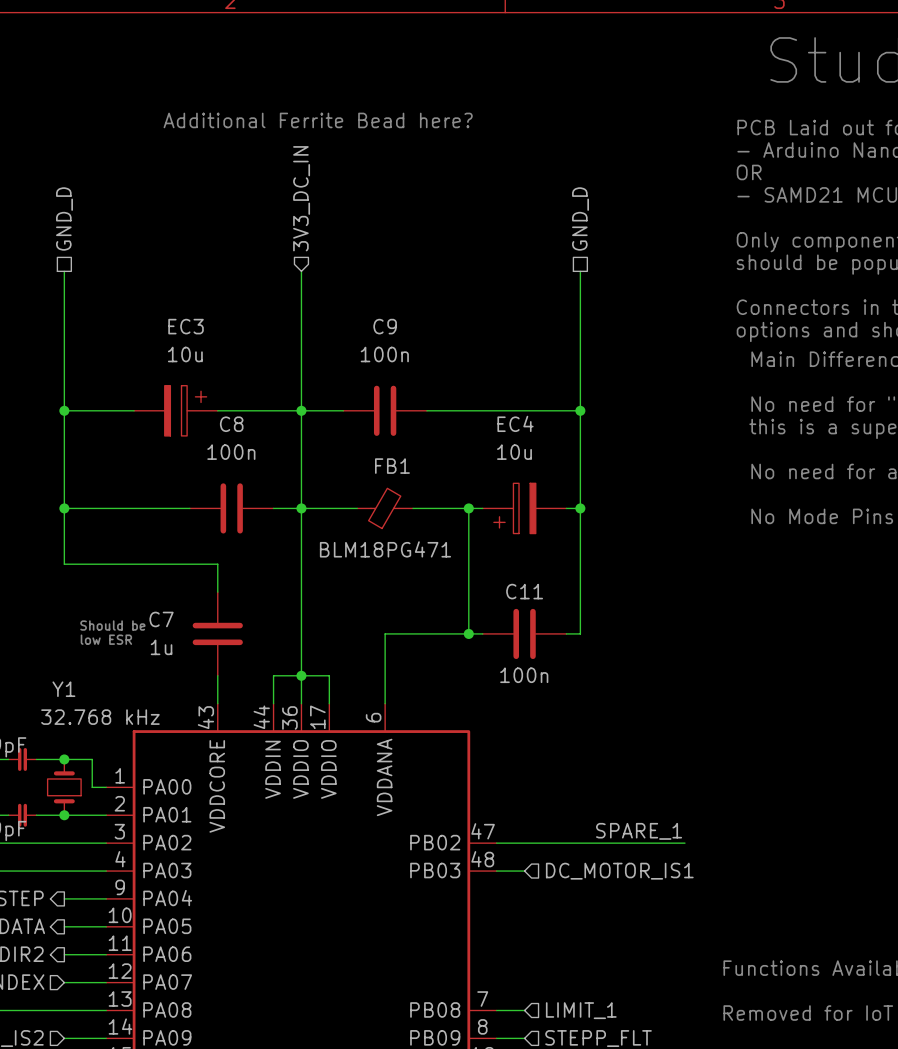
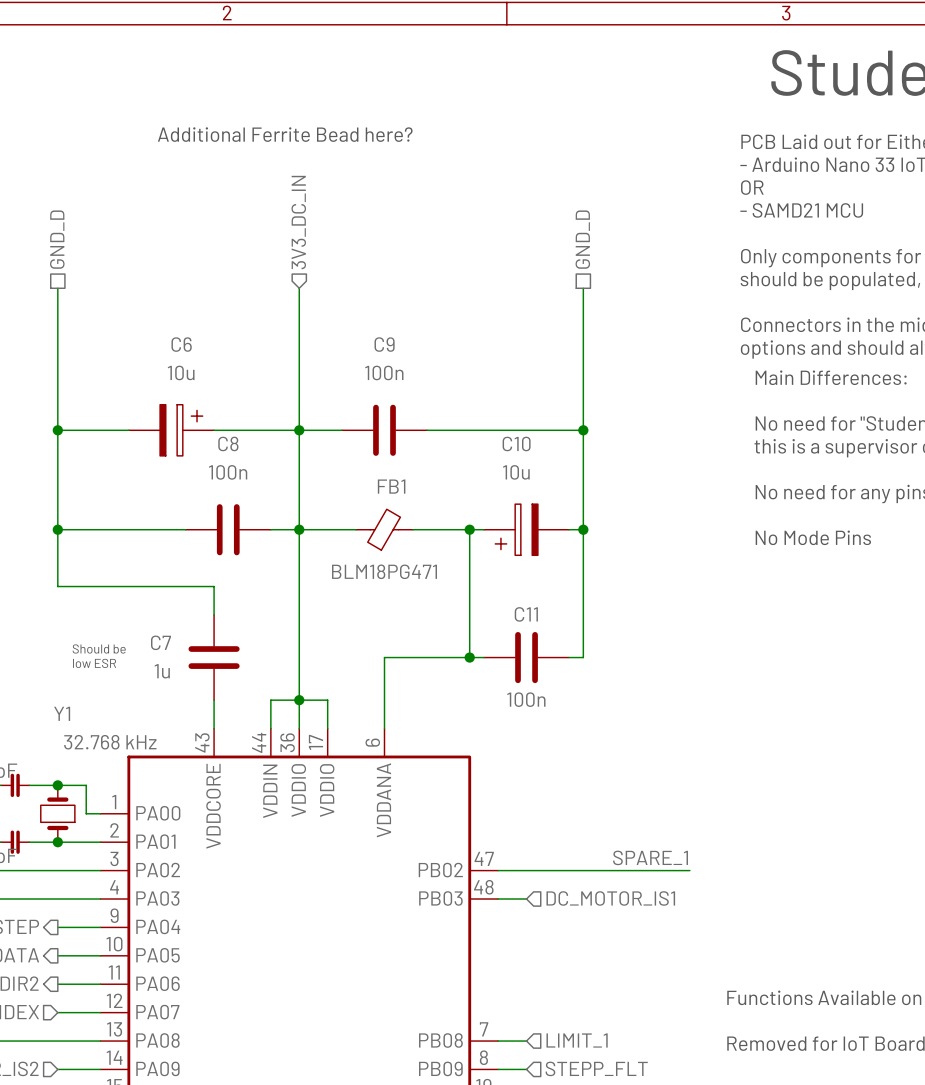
EC3 name: EC3 (186, 326) -> C6 (181, 344)
EC4 name: EC4 (515, 423) -> C10 (516, 443)

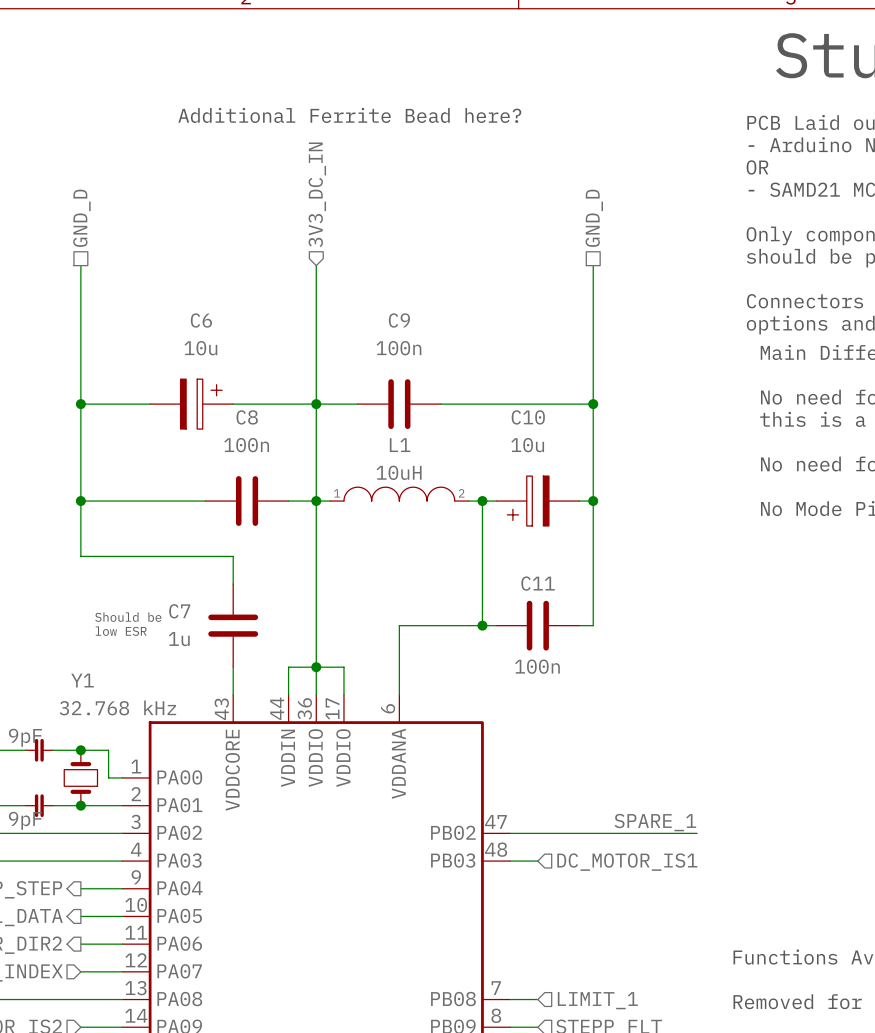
L1: none -> 10uH (399, 494)
wire: (313, 529) (356, 529) -> none
FB1: BLM18PG471 (384, 529) -> none
wire: (412, 529) (455, 529) -> none

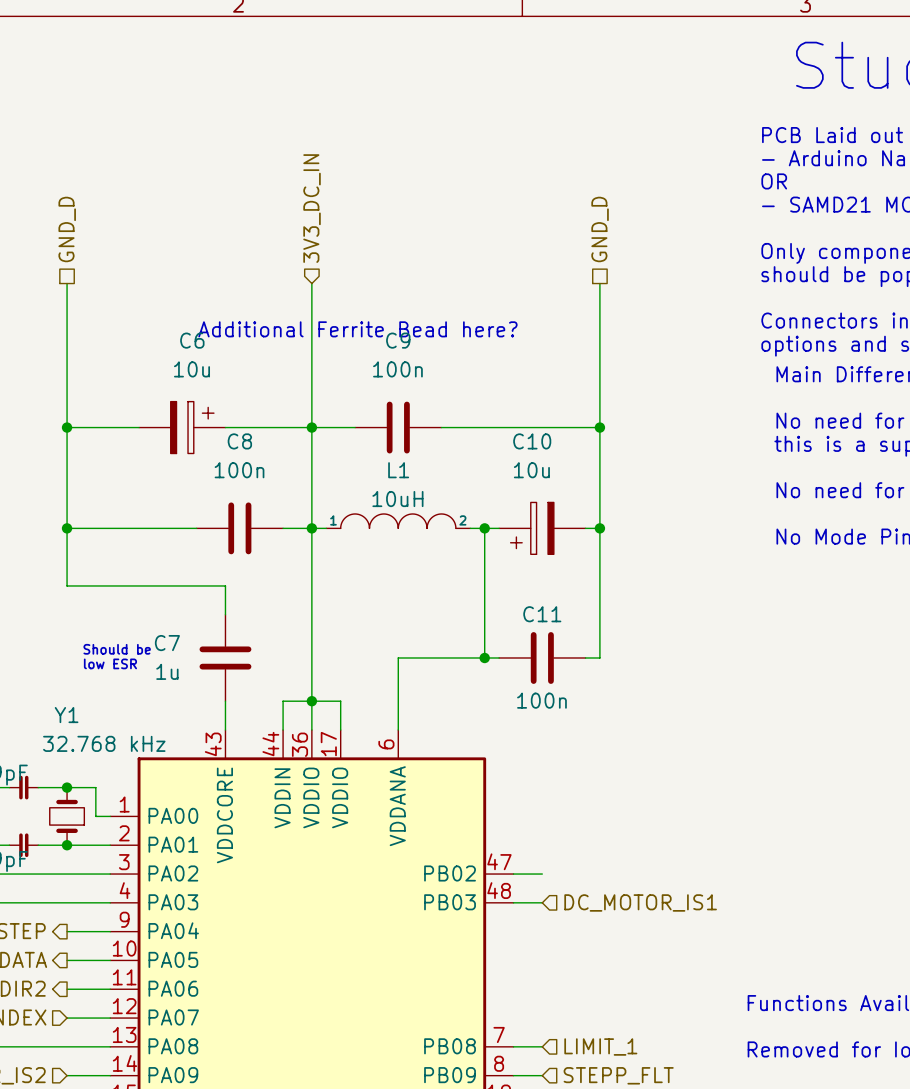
text position: Additional Ferrite Bead here? (349, 115) -> Additional Ferrite Bead here? (357, 329)
label: SPARE_1 (655, 822) -> none
wire: (537, 833) (697, 833) -> none

